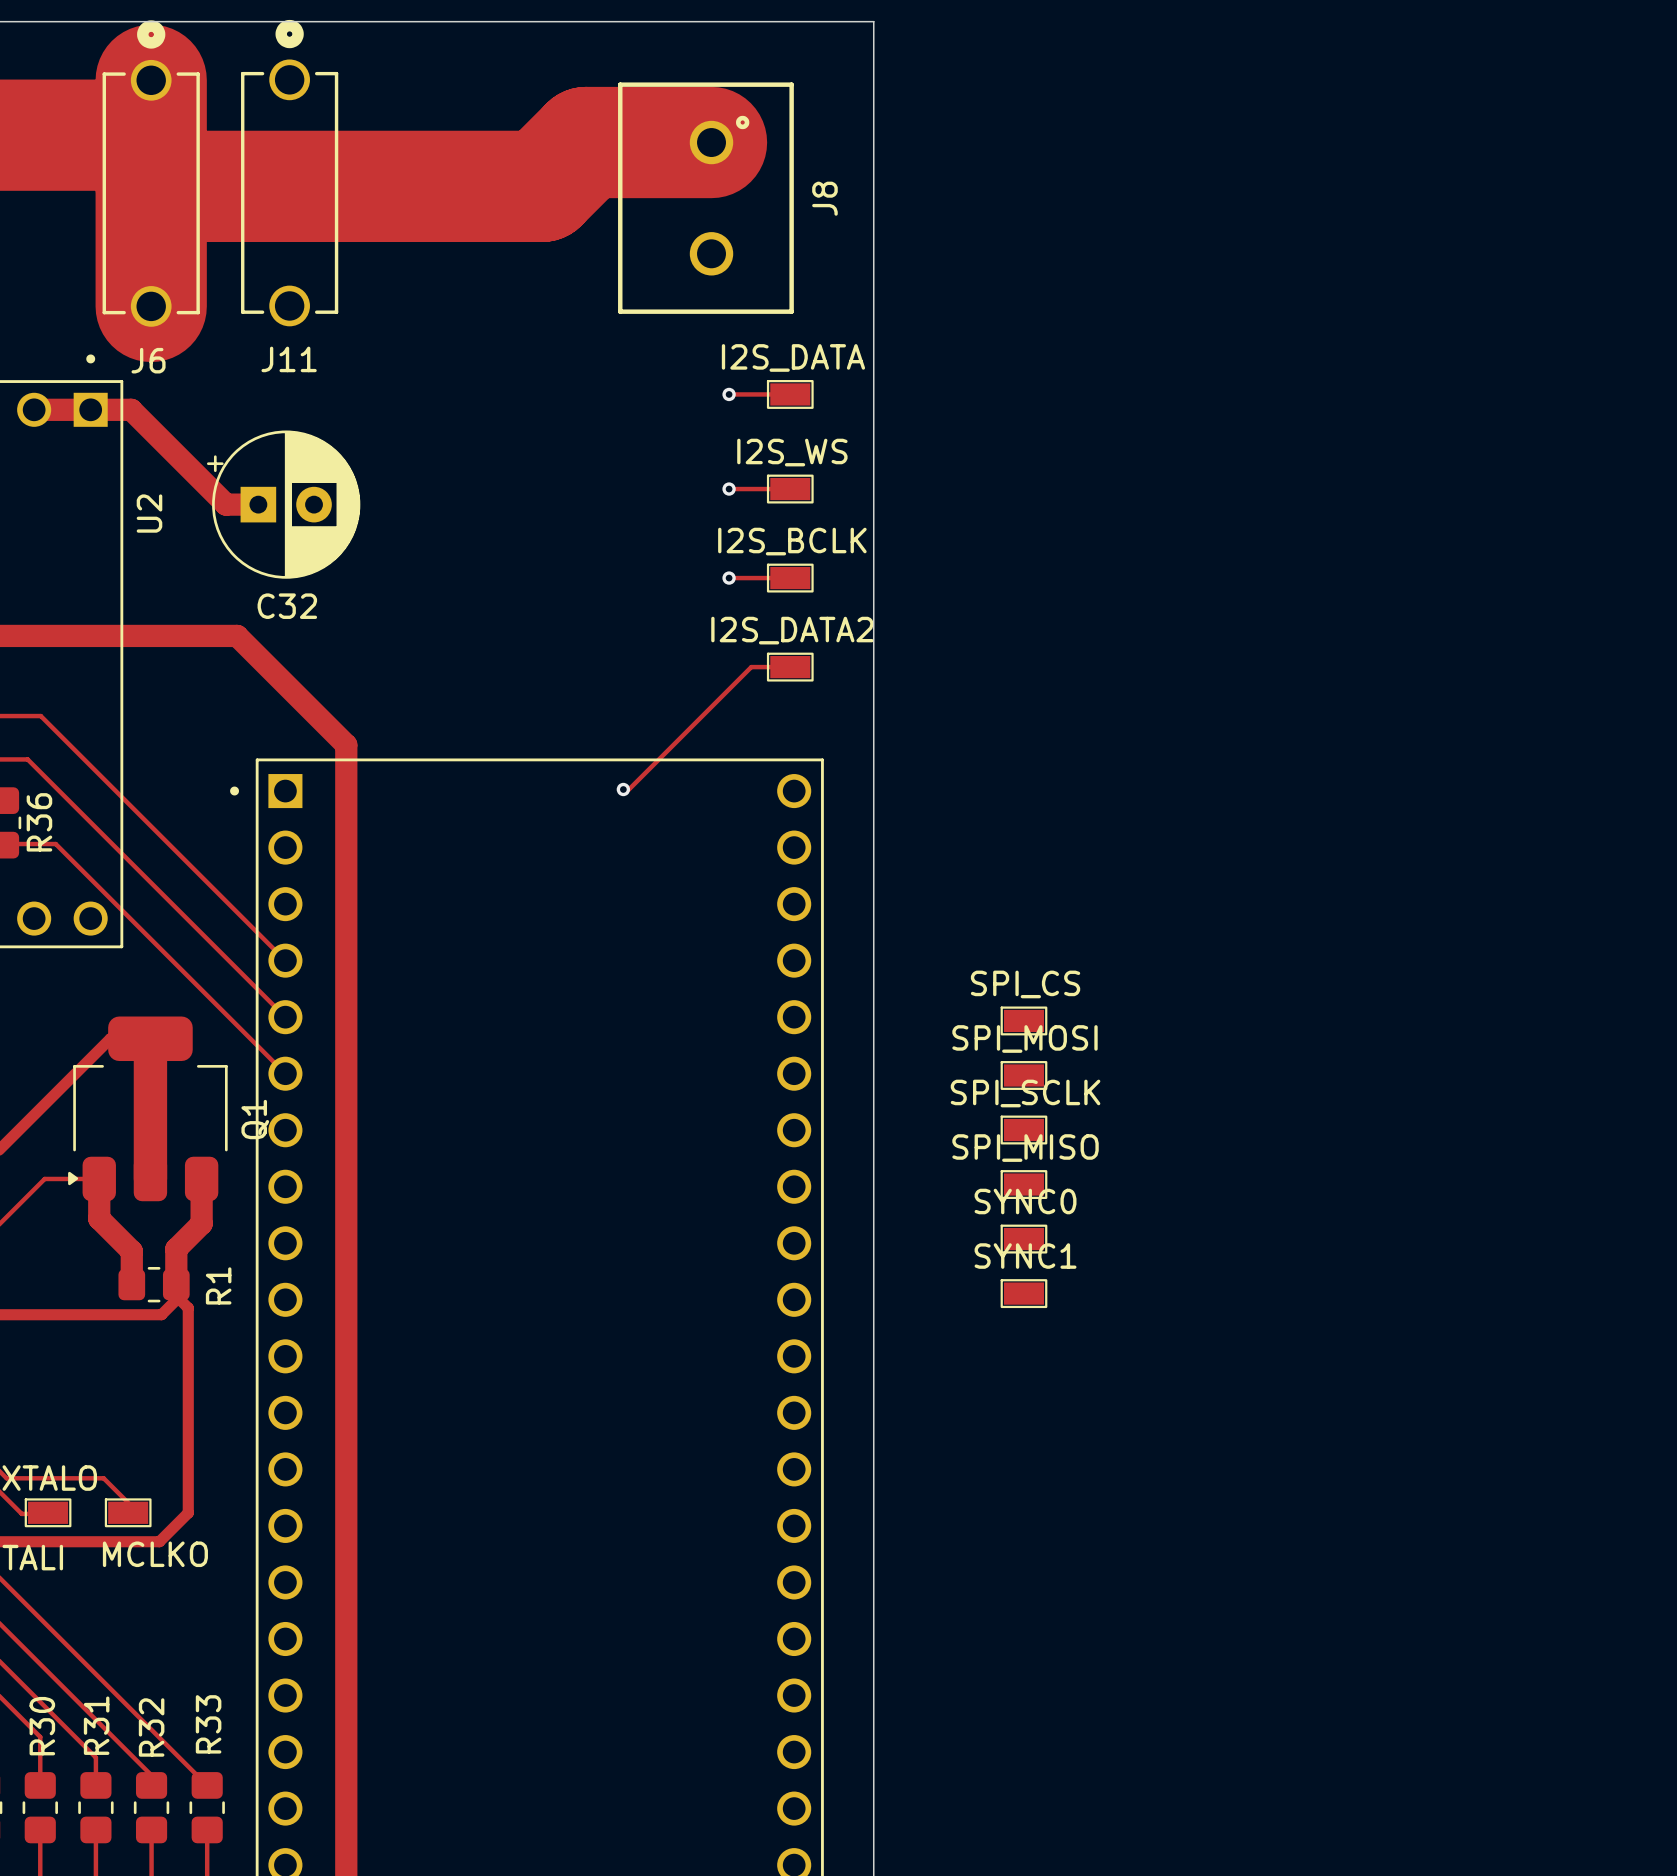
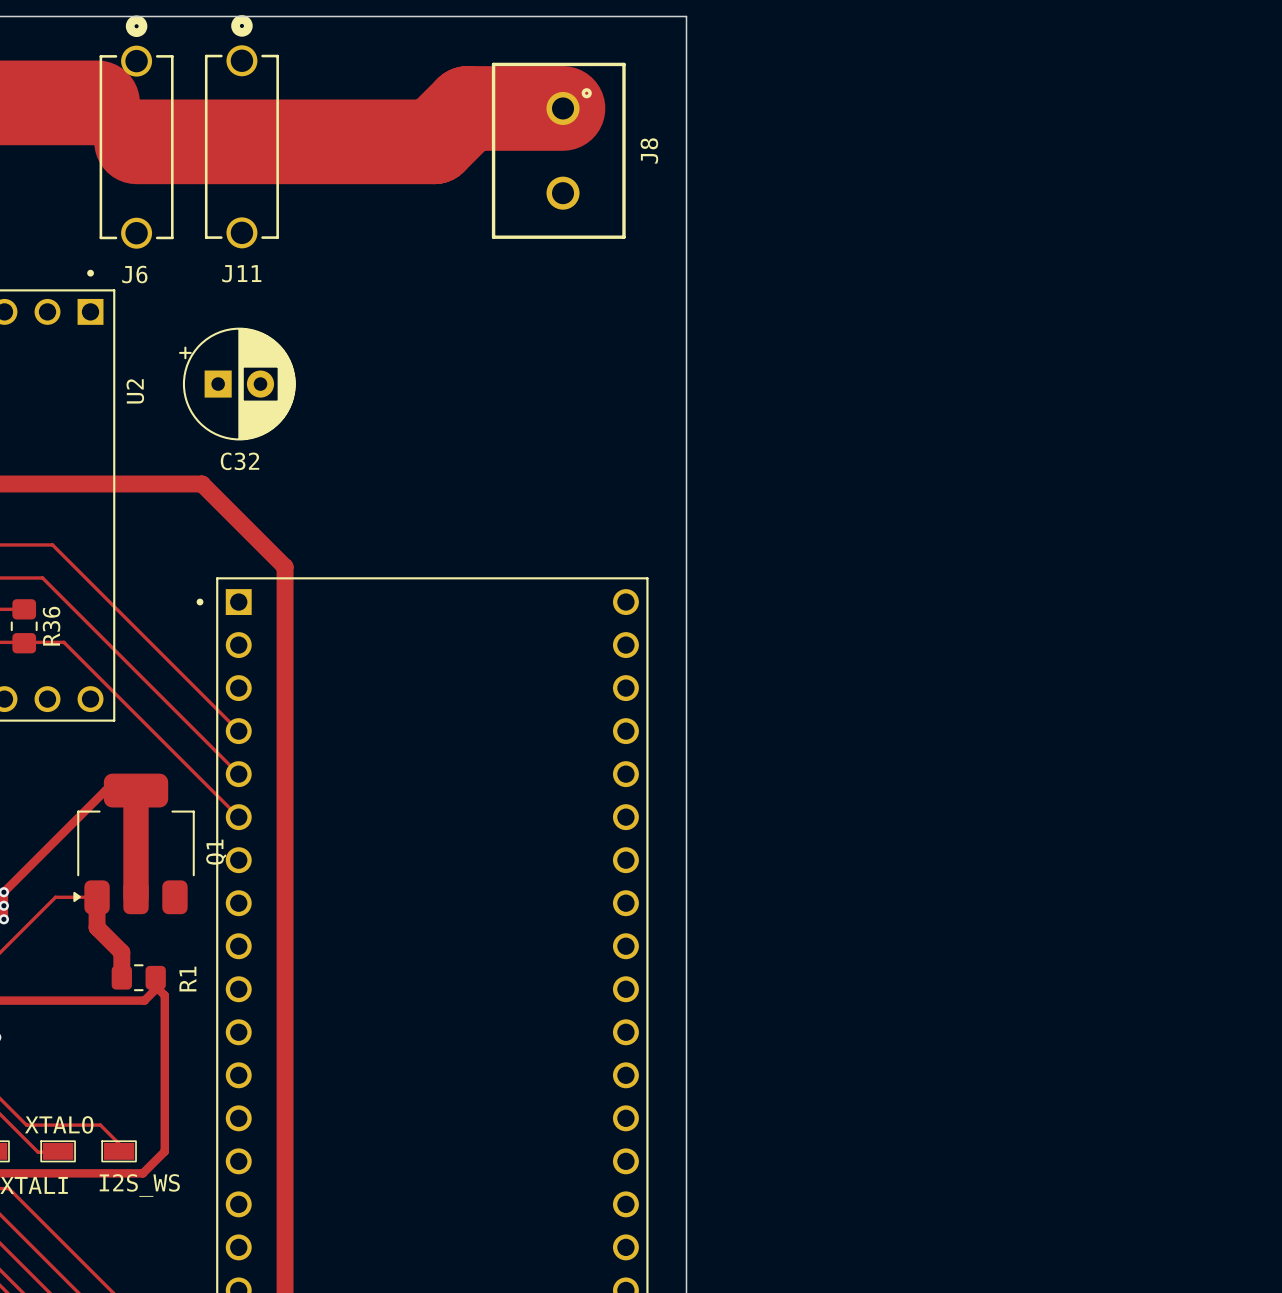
track: (151, 80) (151, 306) -> none
track: (729, 394) (790, 394) -> none
via: (729, 394) -> none
part: I2S_DATA (790, 394) -> none
track: (34, 409) (131, 409) (226, 504) (258, 504) -> none
track: (729, 489) (790, 489) -> none
via: (729, 489) -> none
part: I2S_WS (790, 489) -> none
track: (729, 578) (790, 578) -> none
via: (729, 578) -> none
part: I2S_BCLK (790, 578) -> none
track: (790, 667) (751, 667) (628, 789) (623, 789) -> none
part: I2S_DATA2 (790, 667) -> none
via: (623, 789) -> none
part: SPI_CS (1023, 1020) -> none
part: SPI_MOSI (1023, 1075) -> none
part: SPI_SCLK (1023, 1130) -> none
track: (201, 1178) (201, 1223) (176, 1249) (176, 1299) -> none
part: SPI_MISO (1023, 1184) -> none
part: SYNC0 (1023, 1239) -> none
part: SYNC1 (1023, 1293) -> none
part value: MCLKO (155, 1554) -> I2S_WS (139, 1185)

